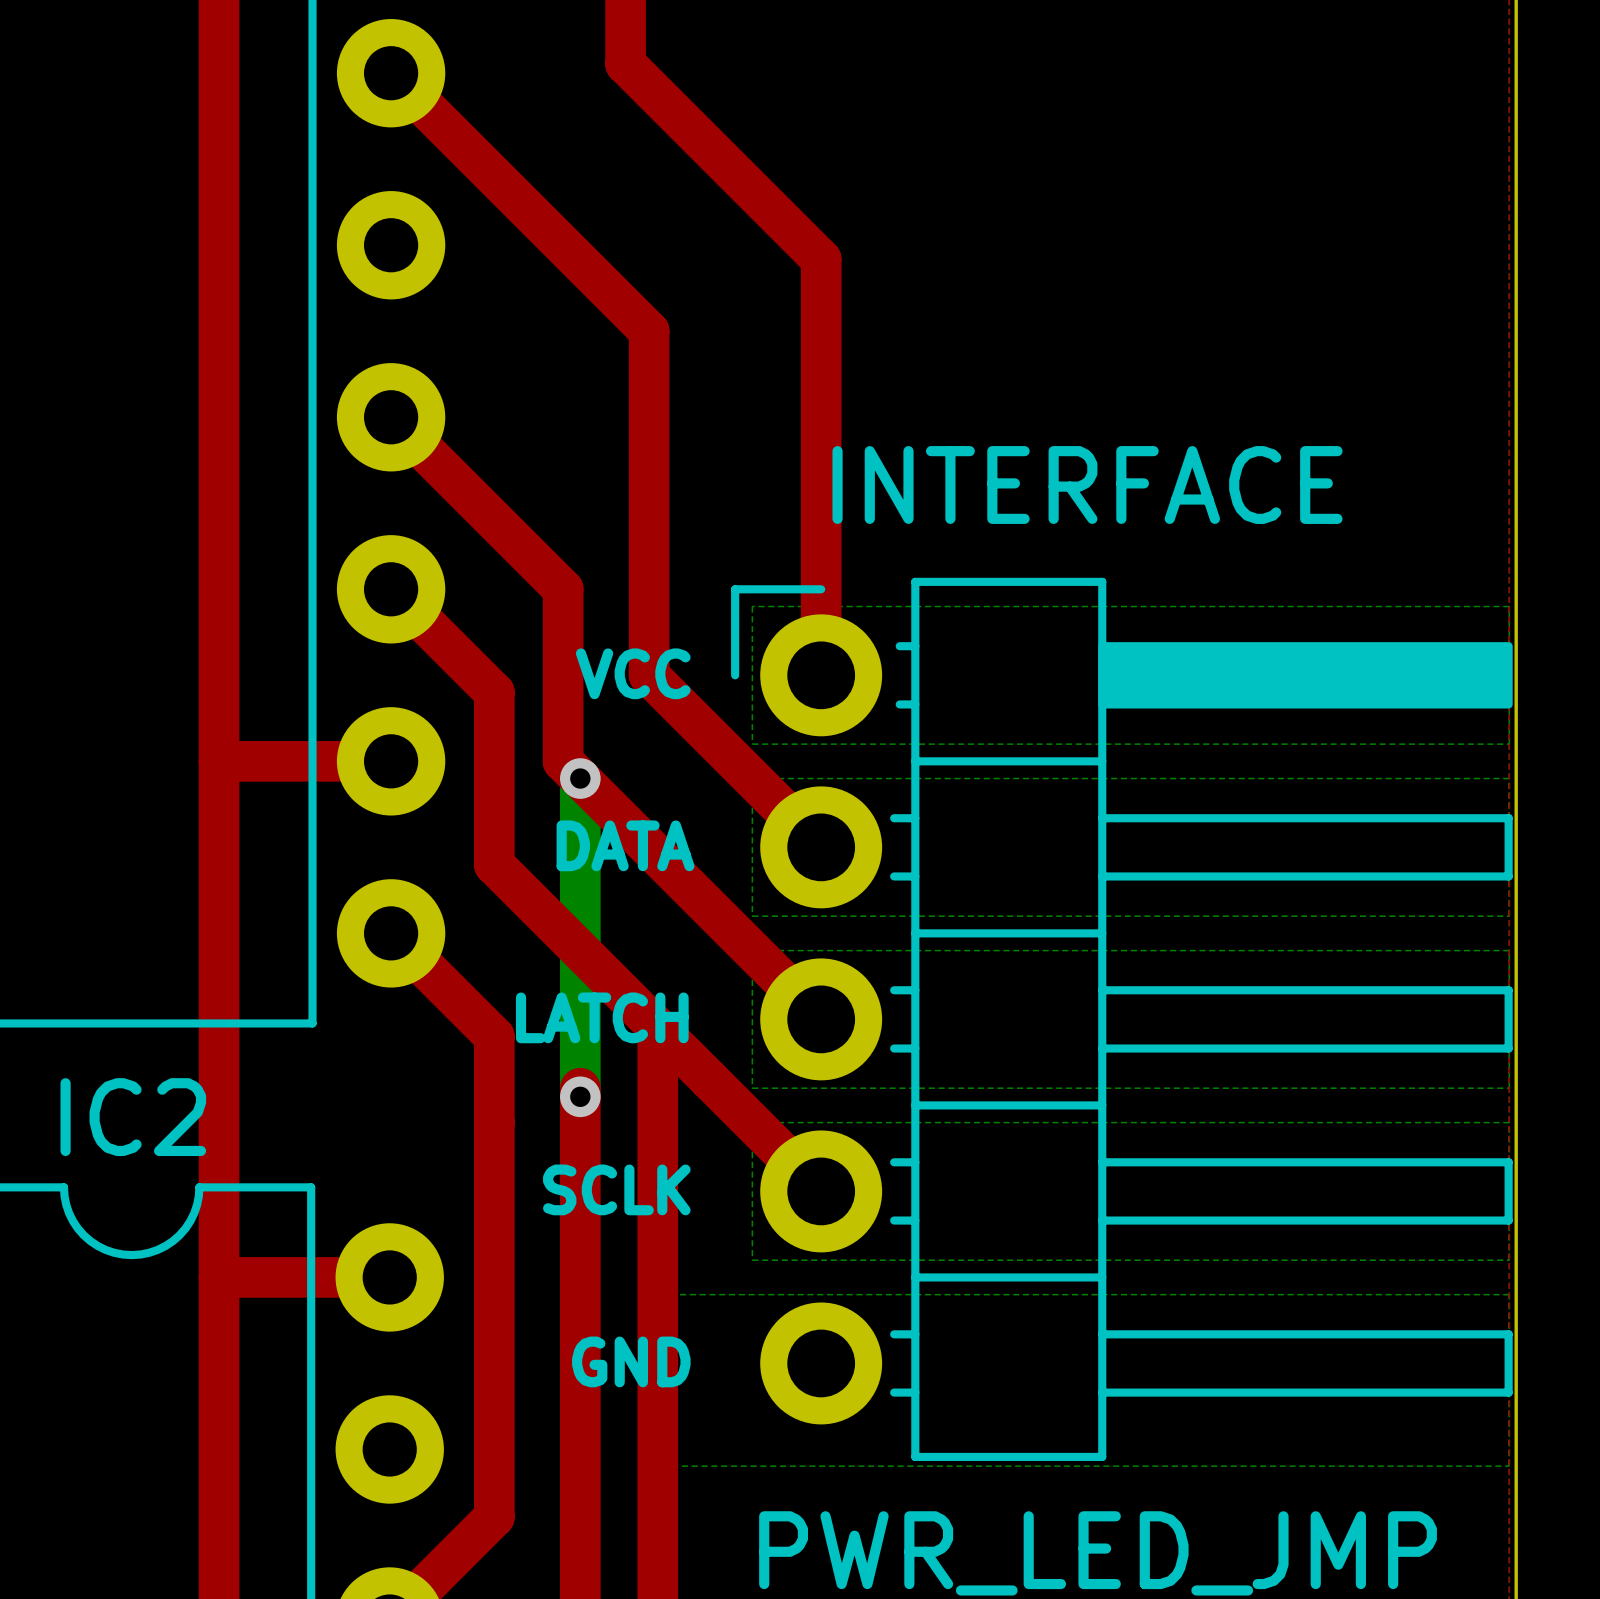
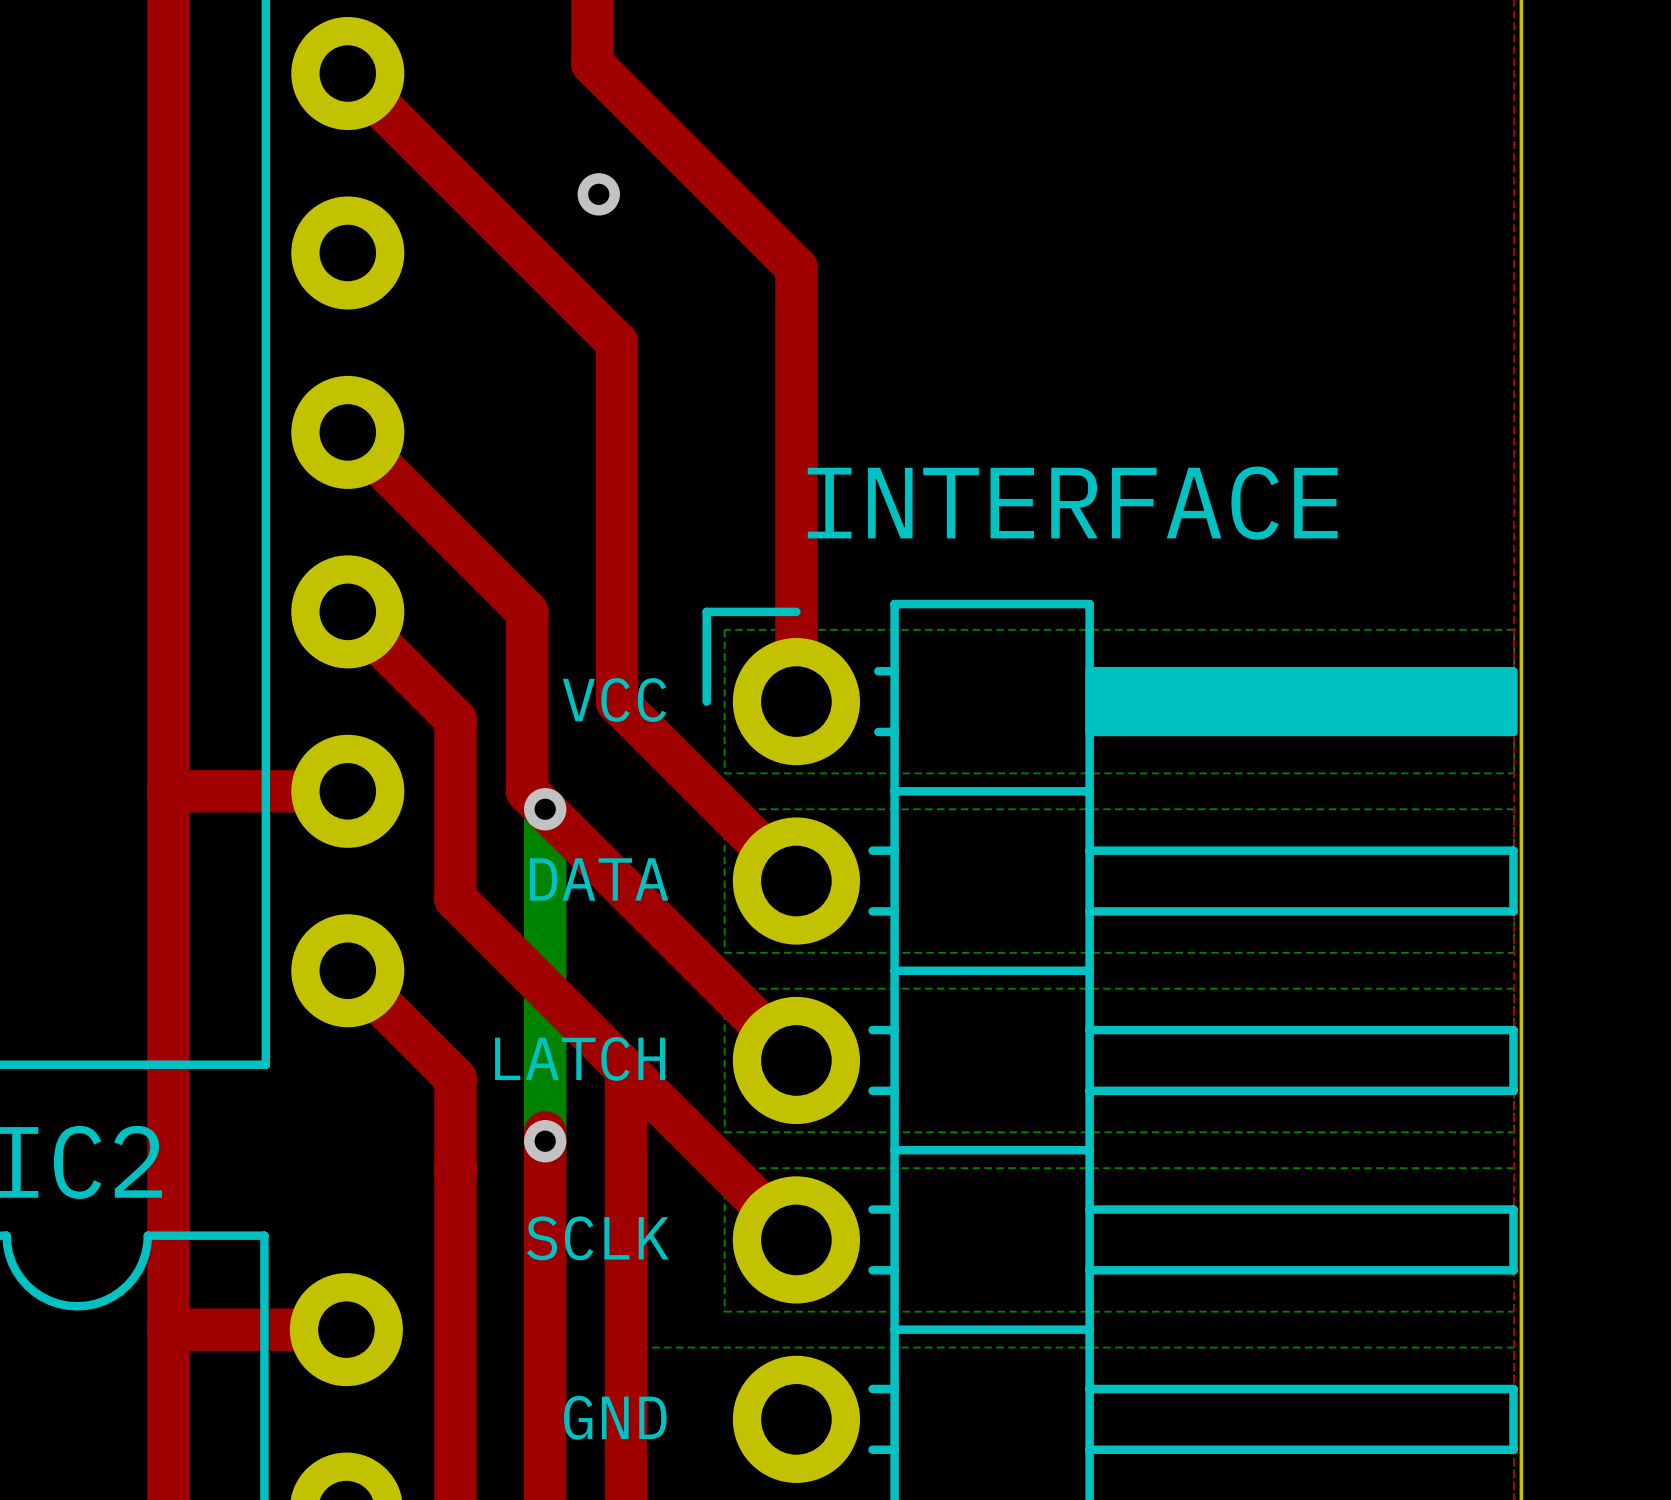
via: none -> (598, 194)

